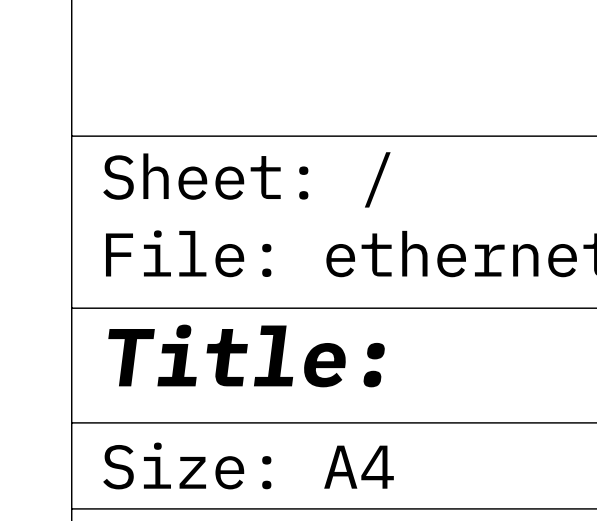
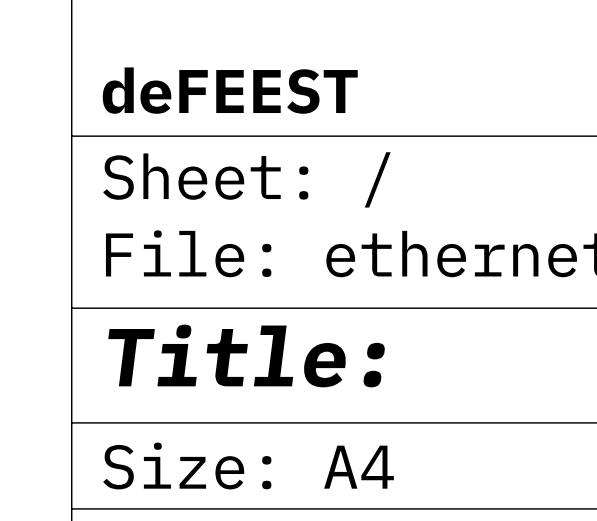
title block: none -> deFEEST (230, 90)

